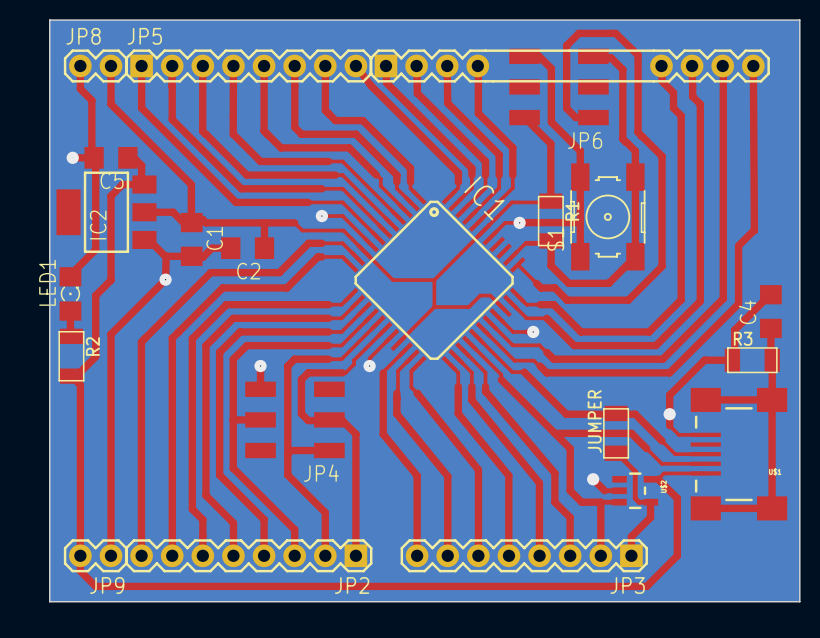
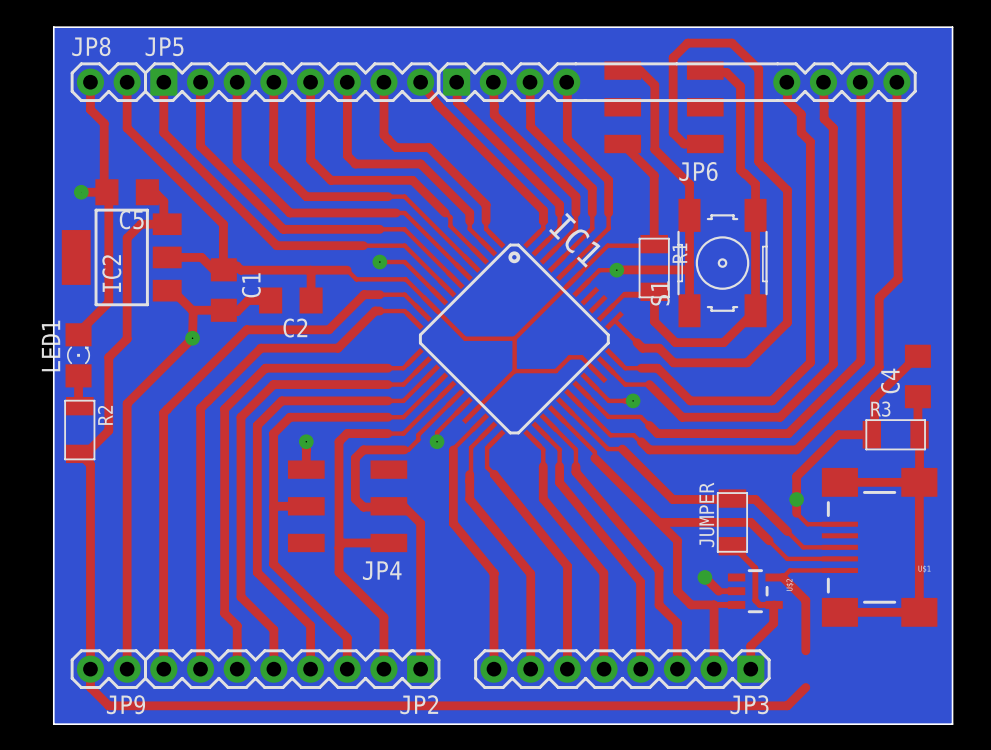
top track: (677, 540) (677, 555) (646, 586) -> (805, 687) (787, 705) (769, 705)

